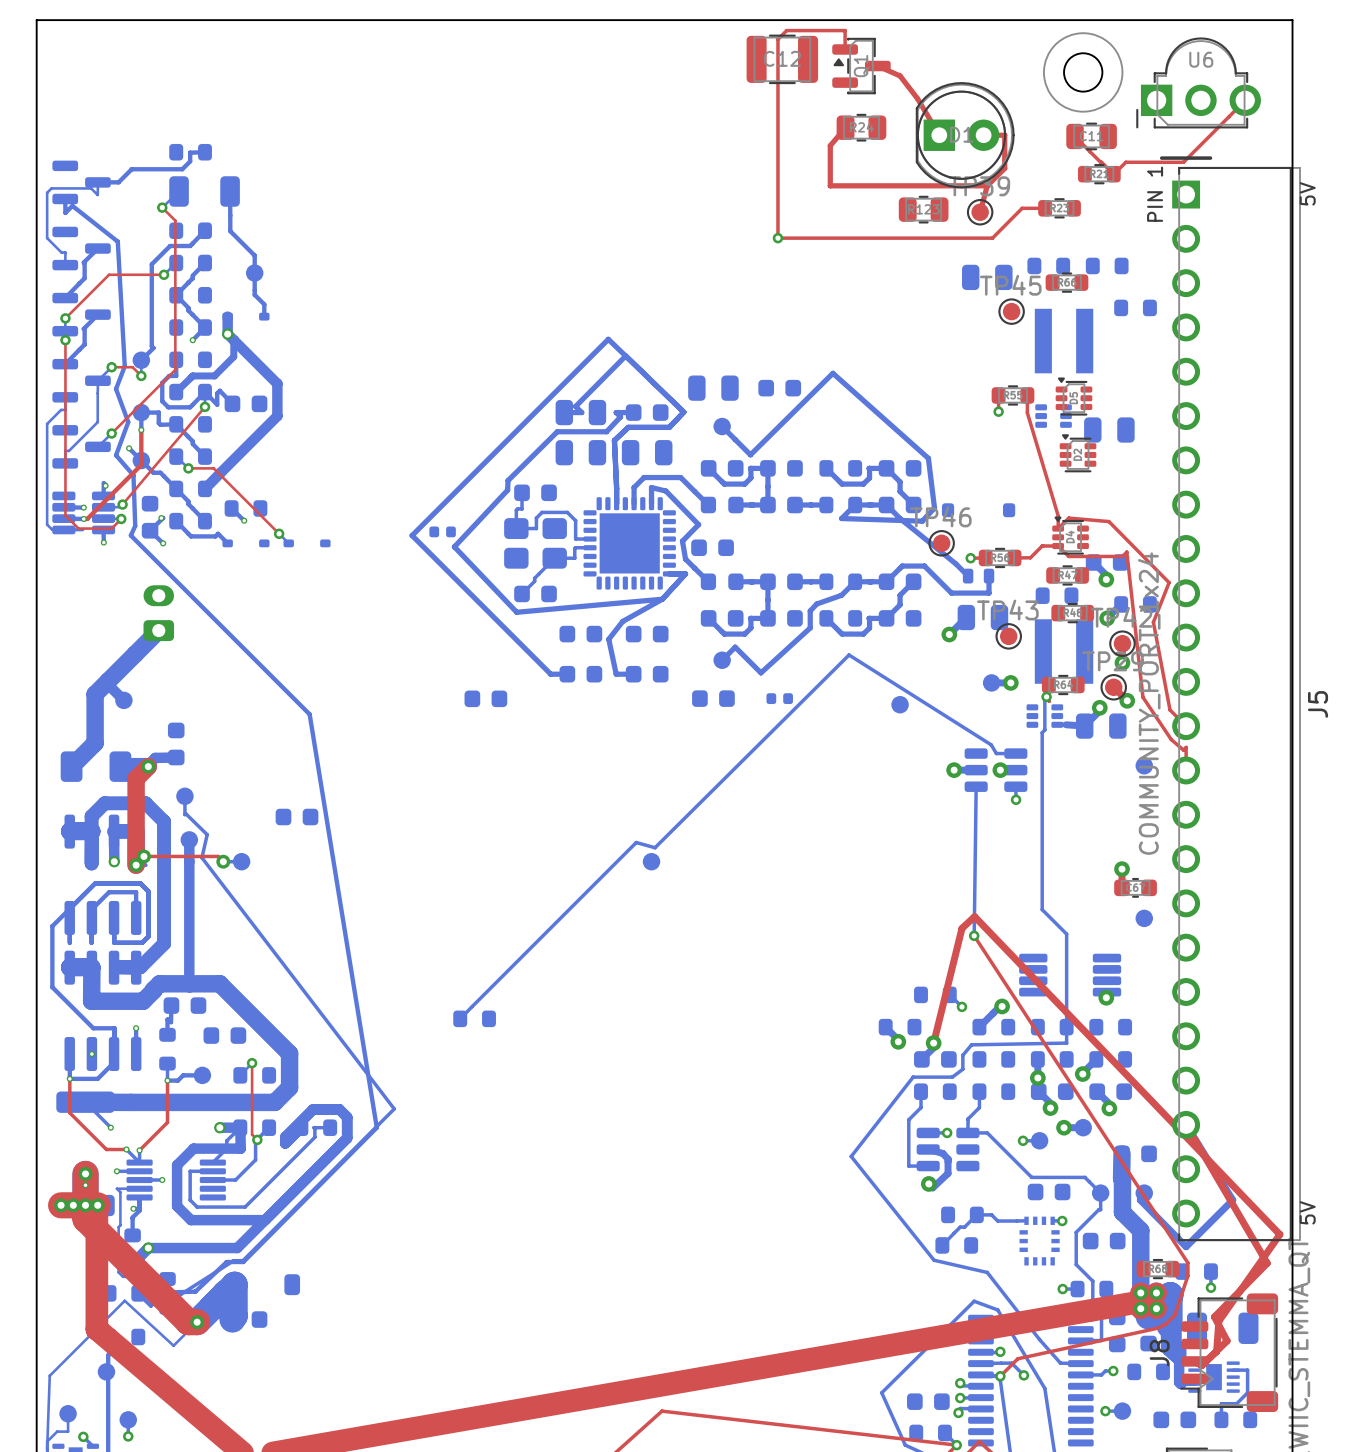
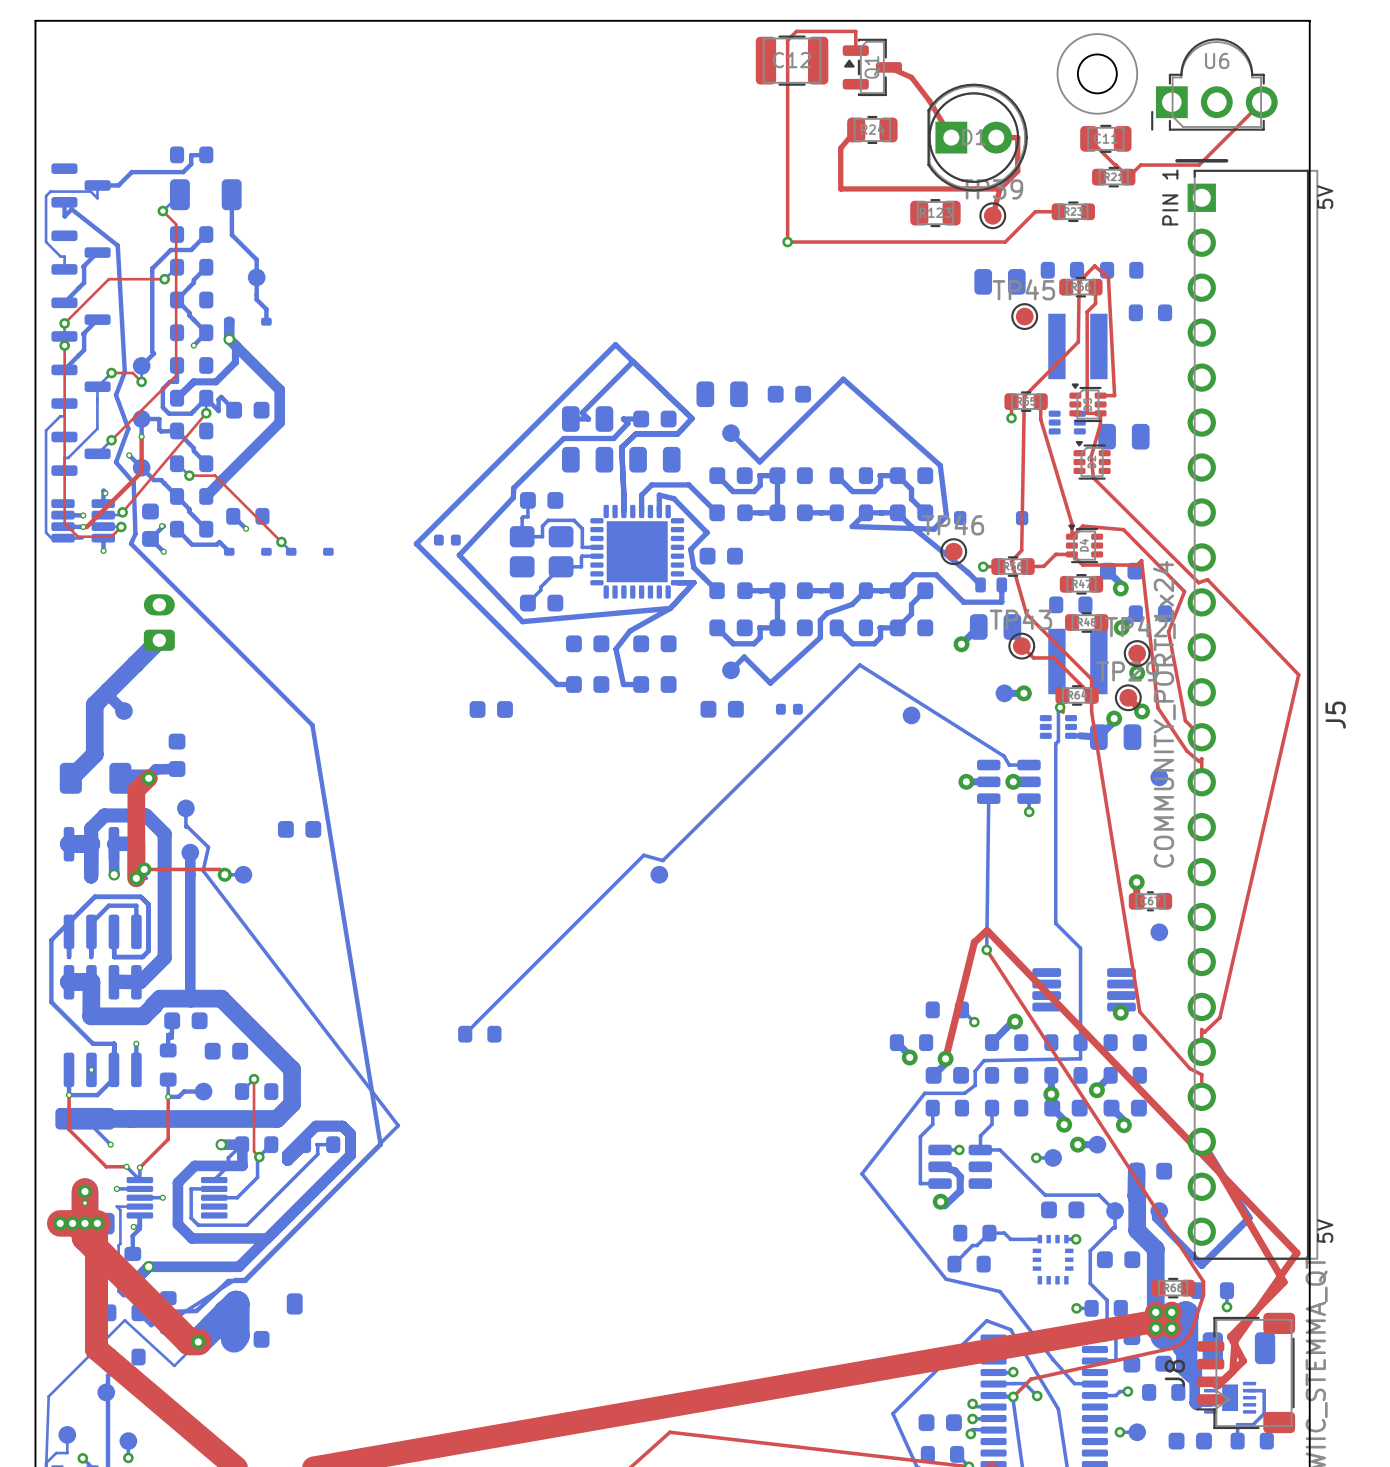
top track: none -> (1095, 287) (1095, 303) (1087, 311) (1086, 413) (1100, 413) (1100, 424) (1091, 456) (1093, 477) (1198, 582) (1207, 579) (1298, 674) (1219, 1017) (1204, 1032) (1201, 1029) (1201, 1051)
top track: none -> (1100, 395) (1114, 395) (1108, 277) (1094, 265) (1079, 281) (1078, 342) (1024, 396) (1021, 550) (1011, 561) (1026, 614) (1091, 679) (1091, 695)
top track: none -> (1021, 646) (1033, 657) (1053, 657) (1091, 695)
top track: none -> (1091, 695) (1091, 711) (1139, 1011) (1189, 1068) (1201, 1074) (1201, 1096)

